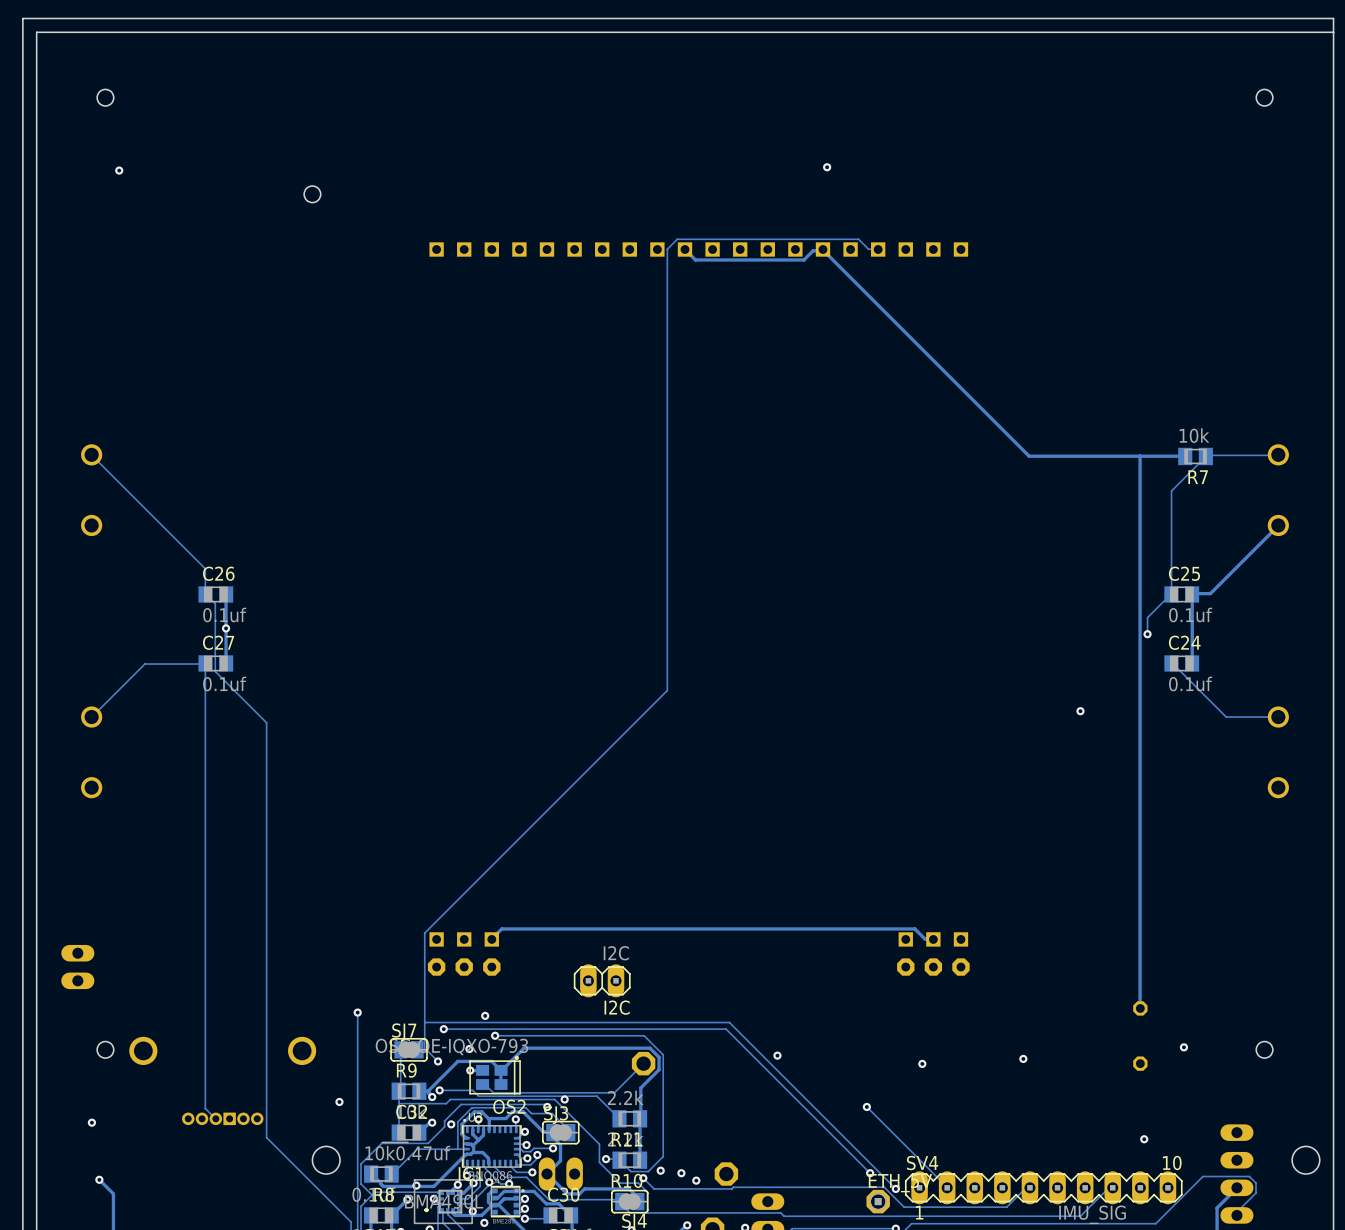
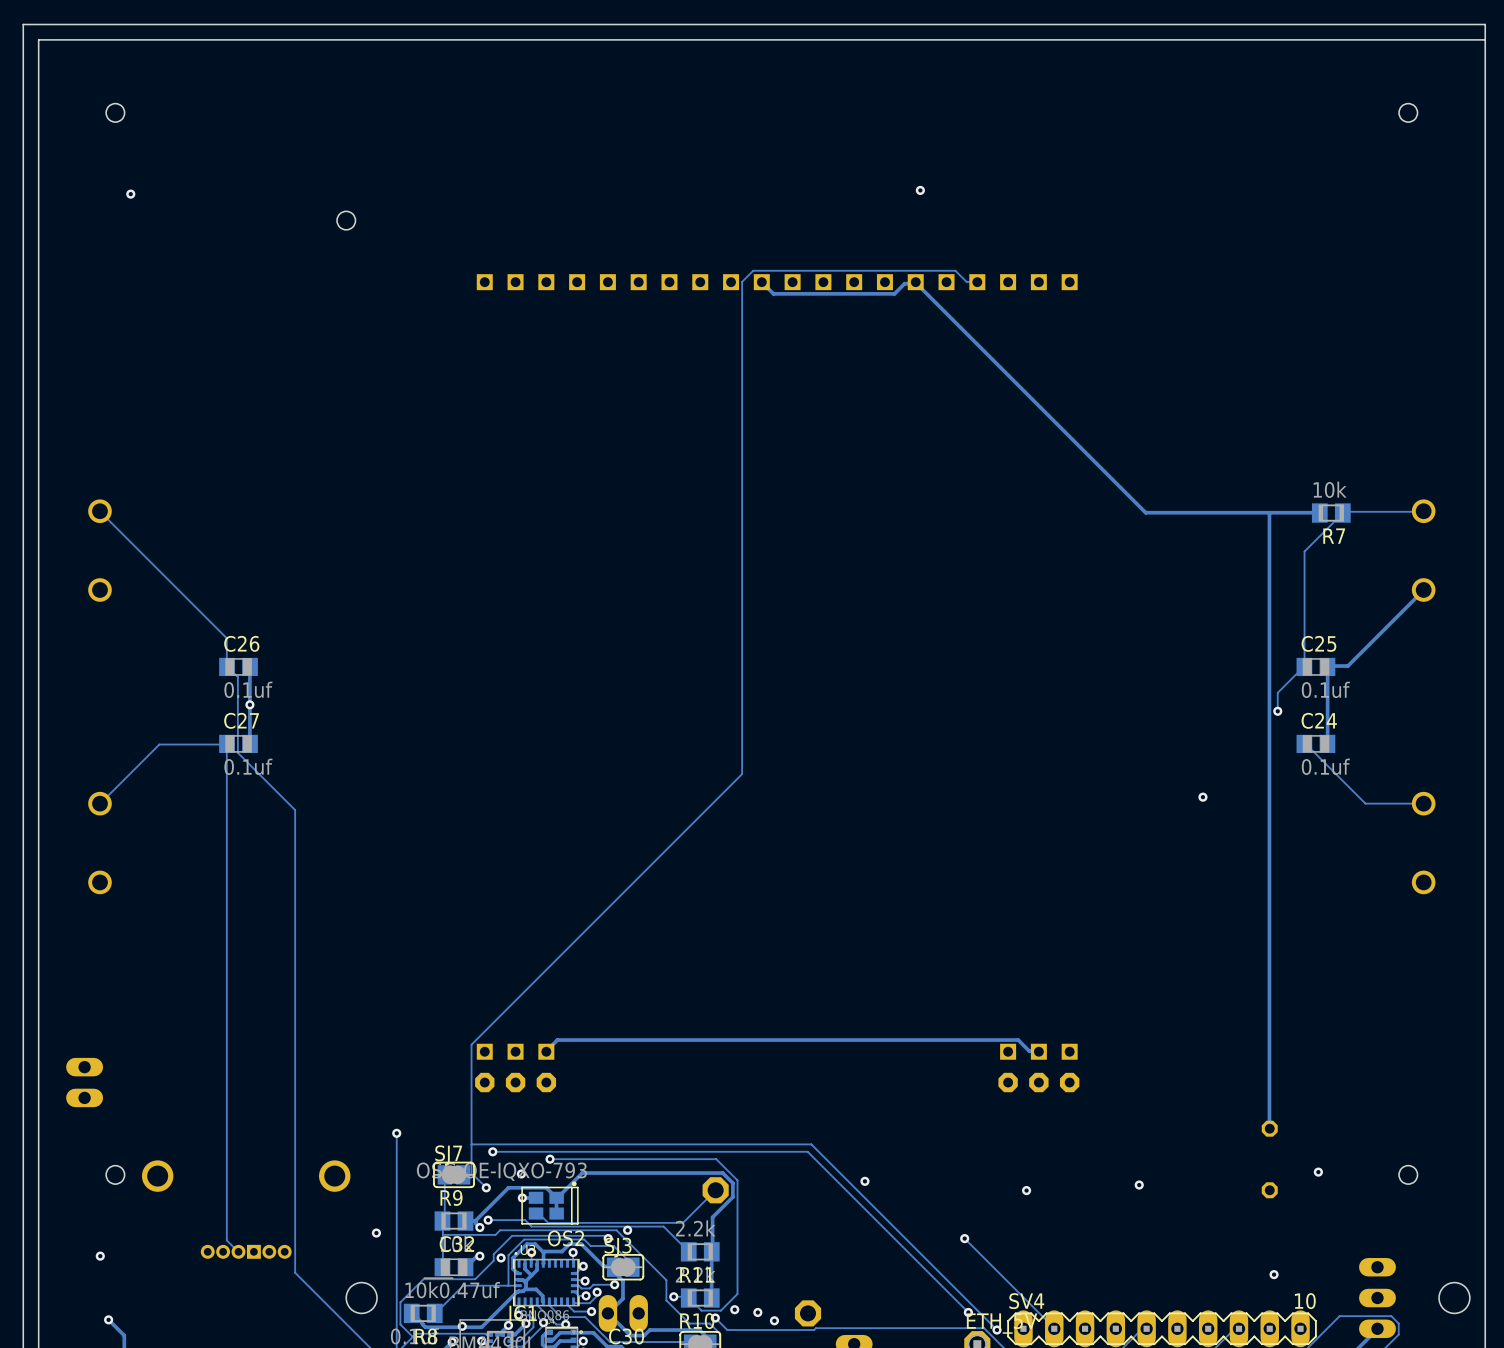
I2C: I2C (602, 980) -> none
via: (485, 1015) -> none

